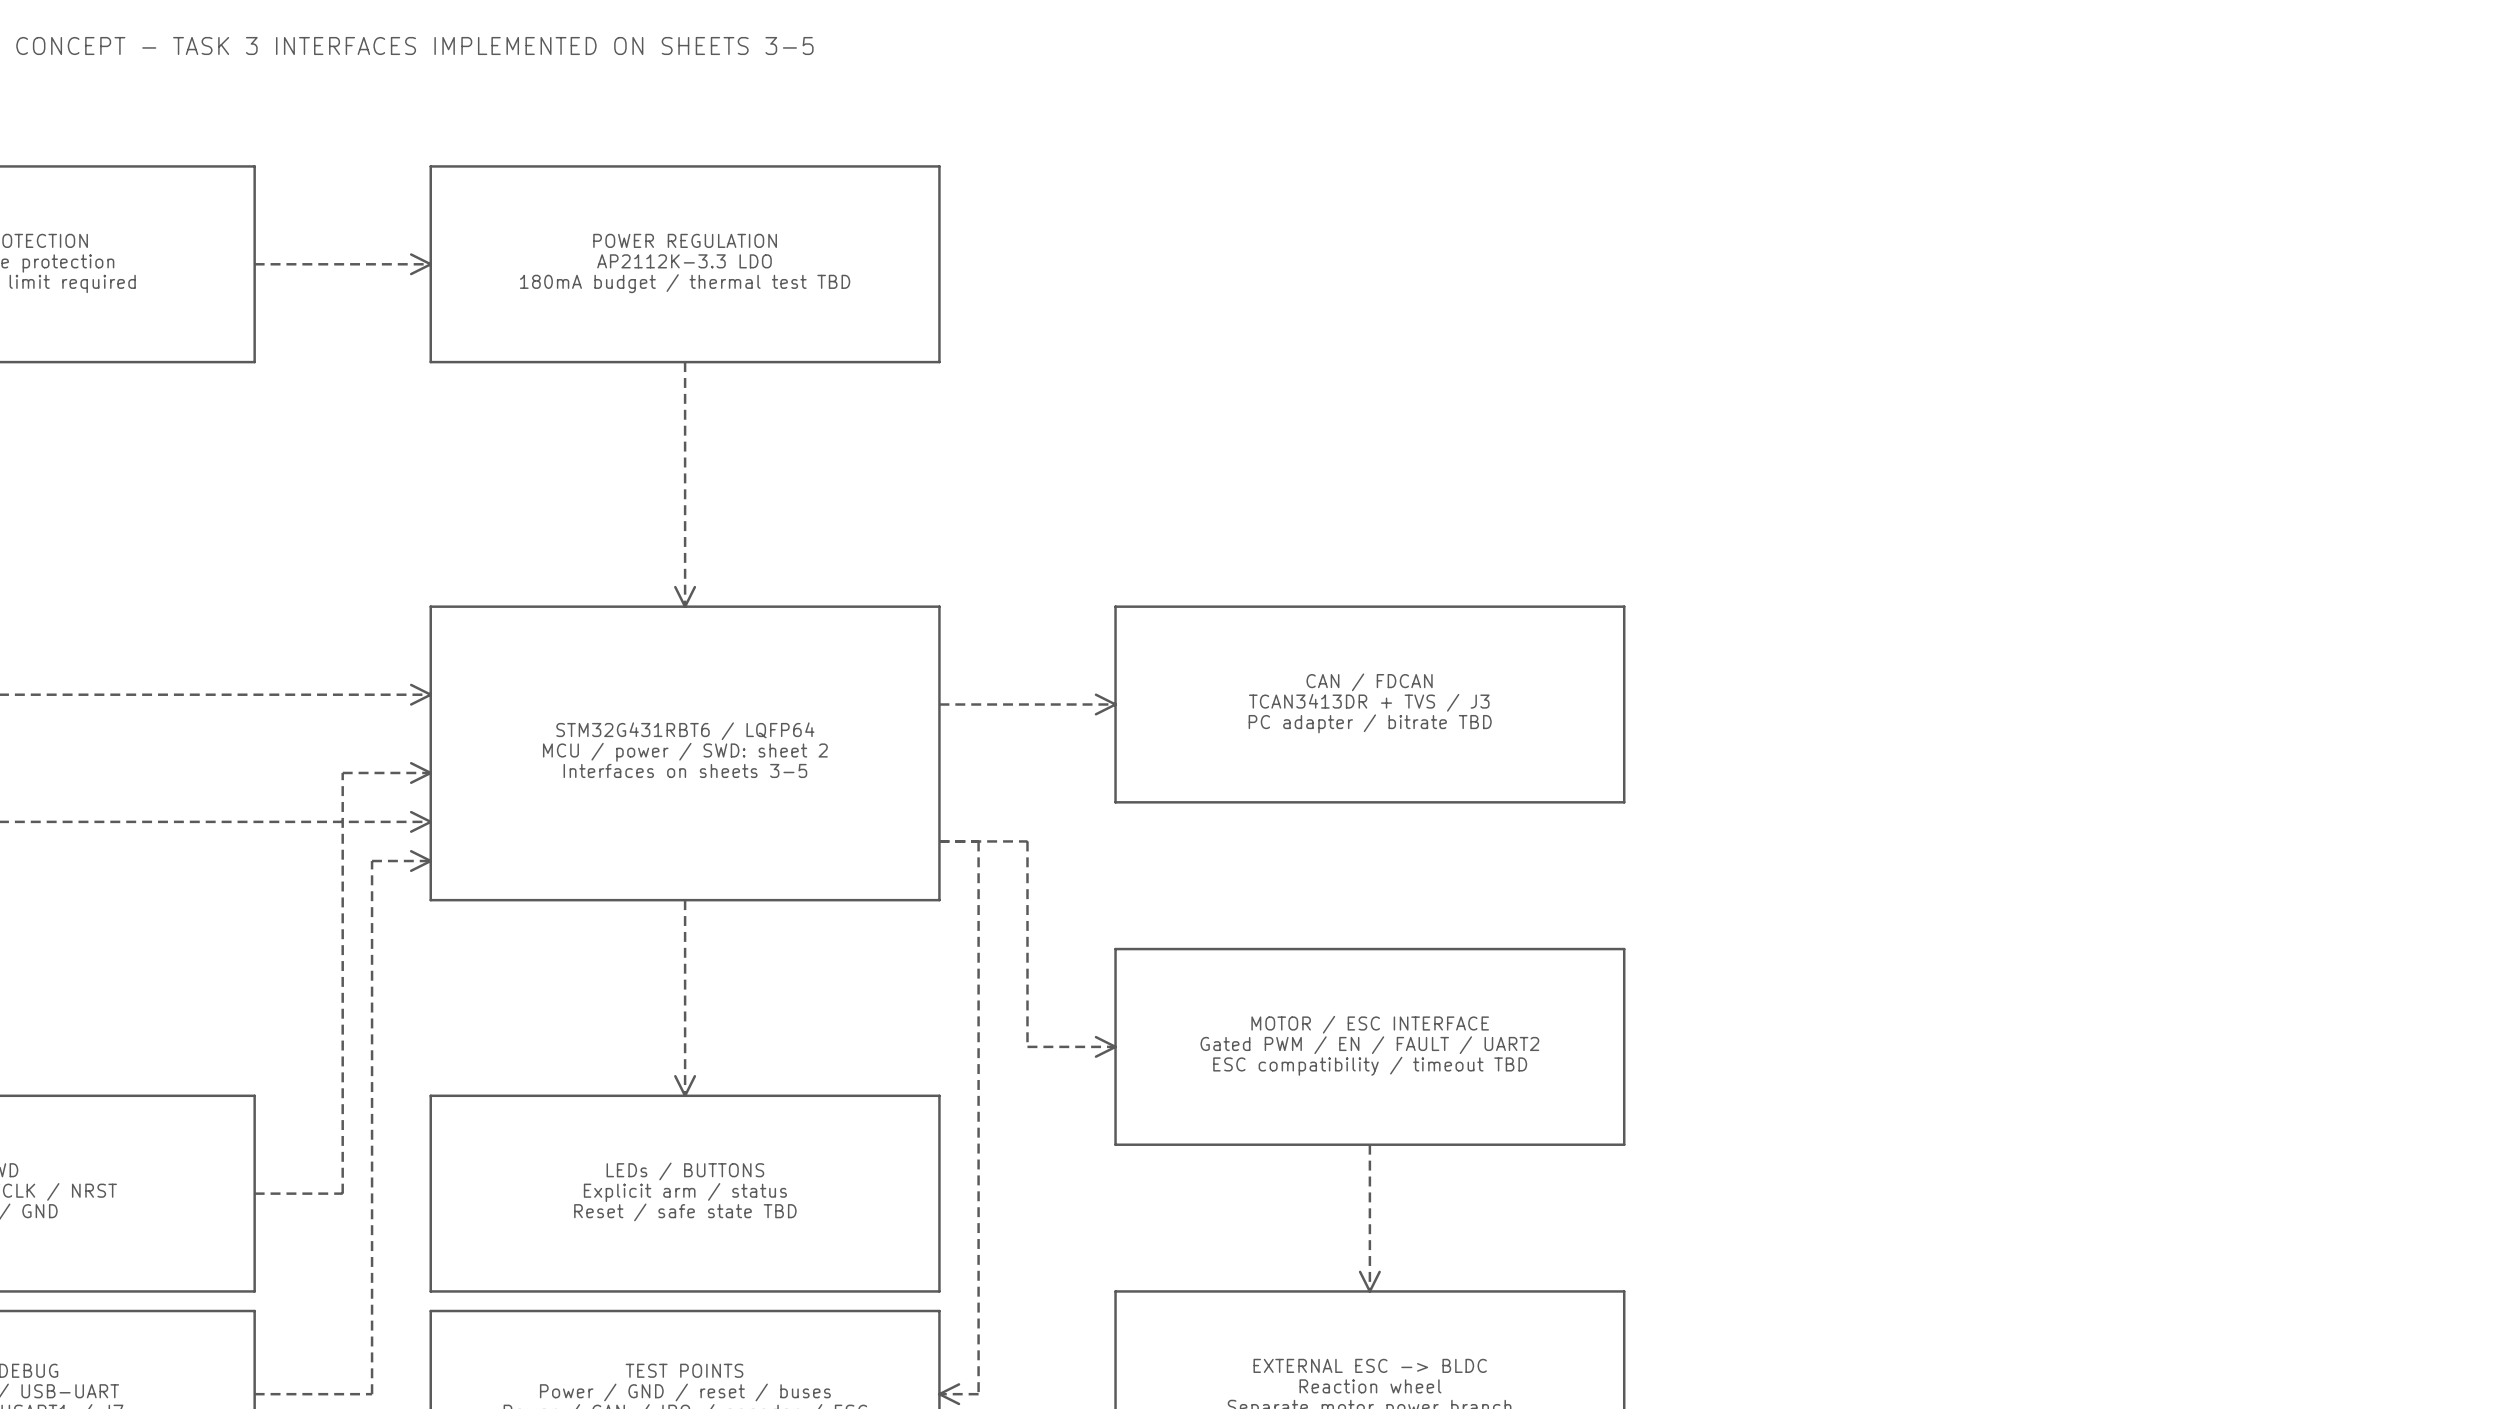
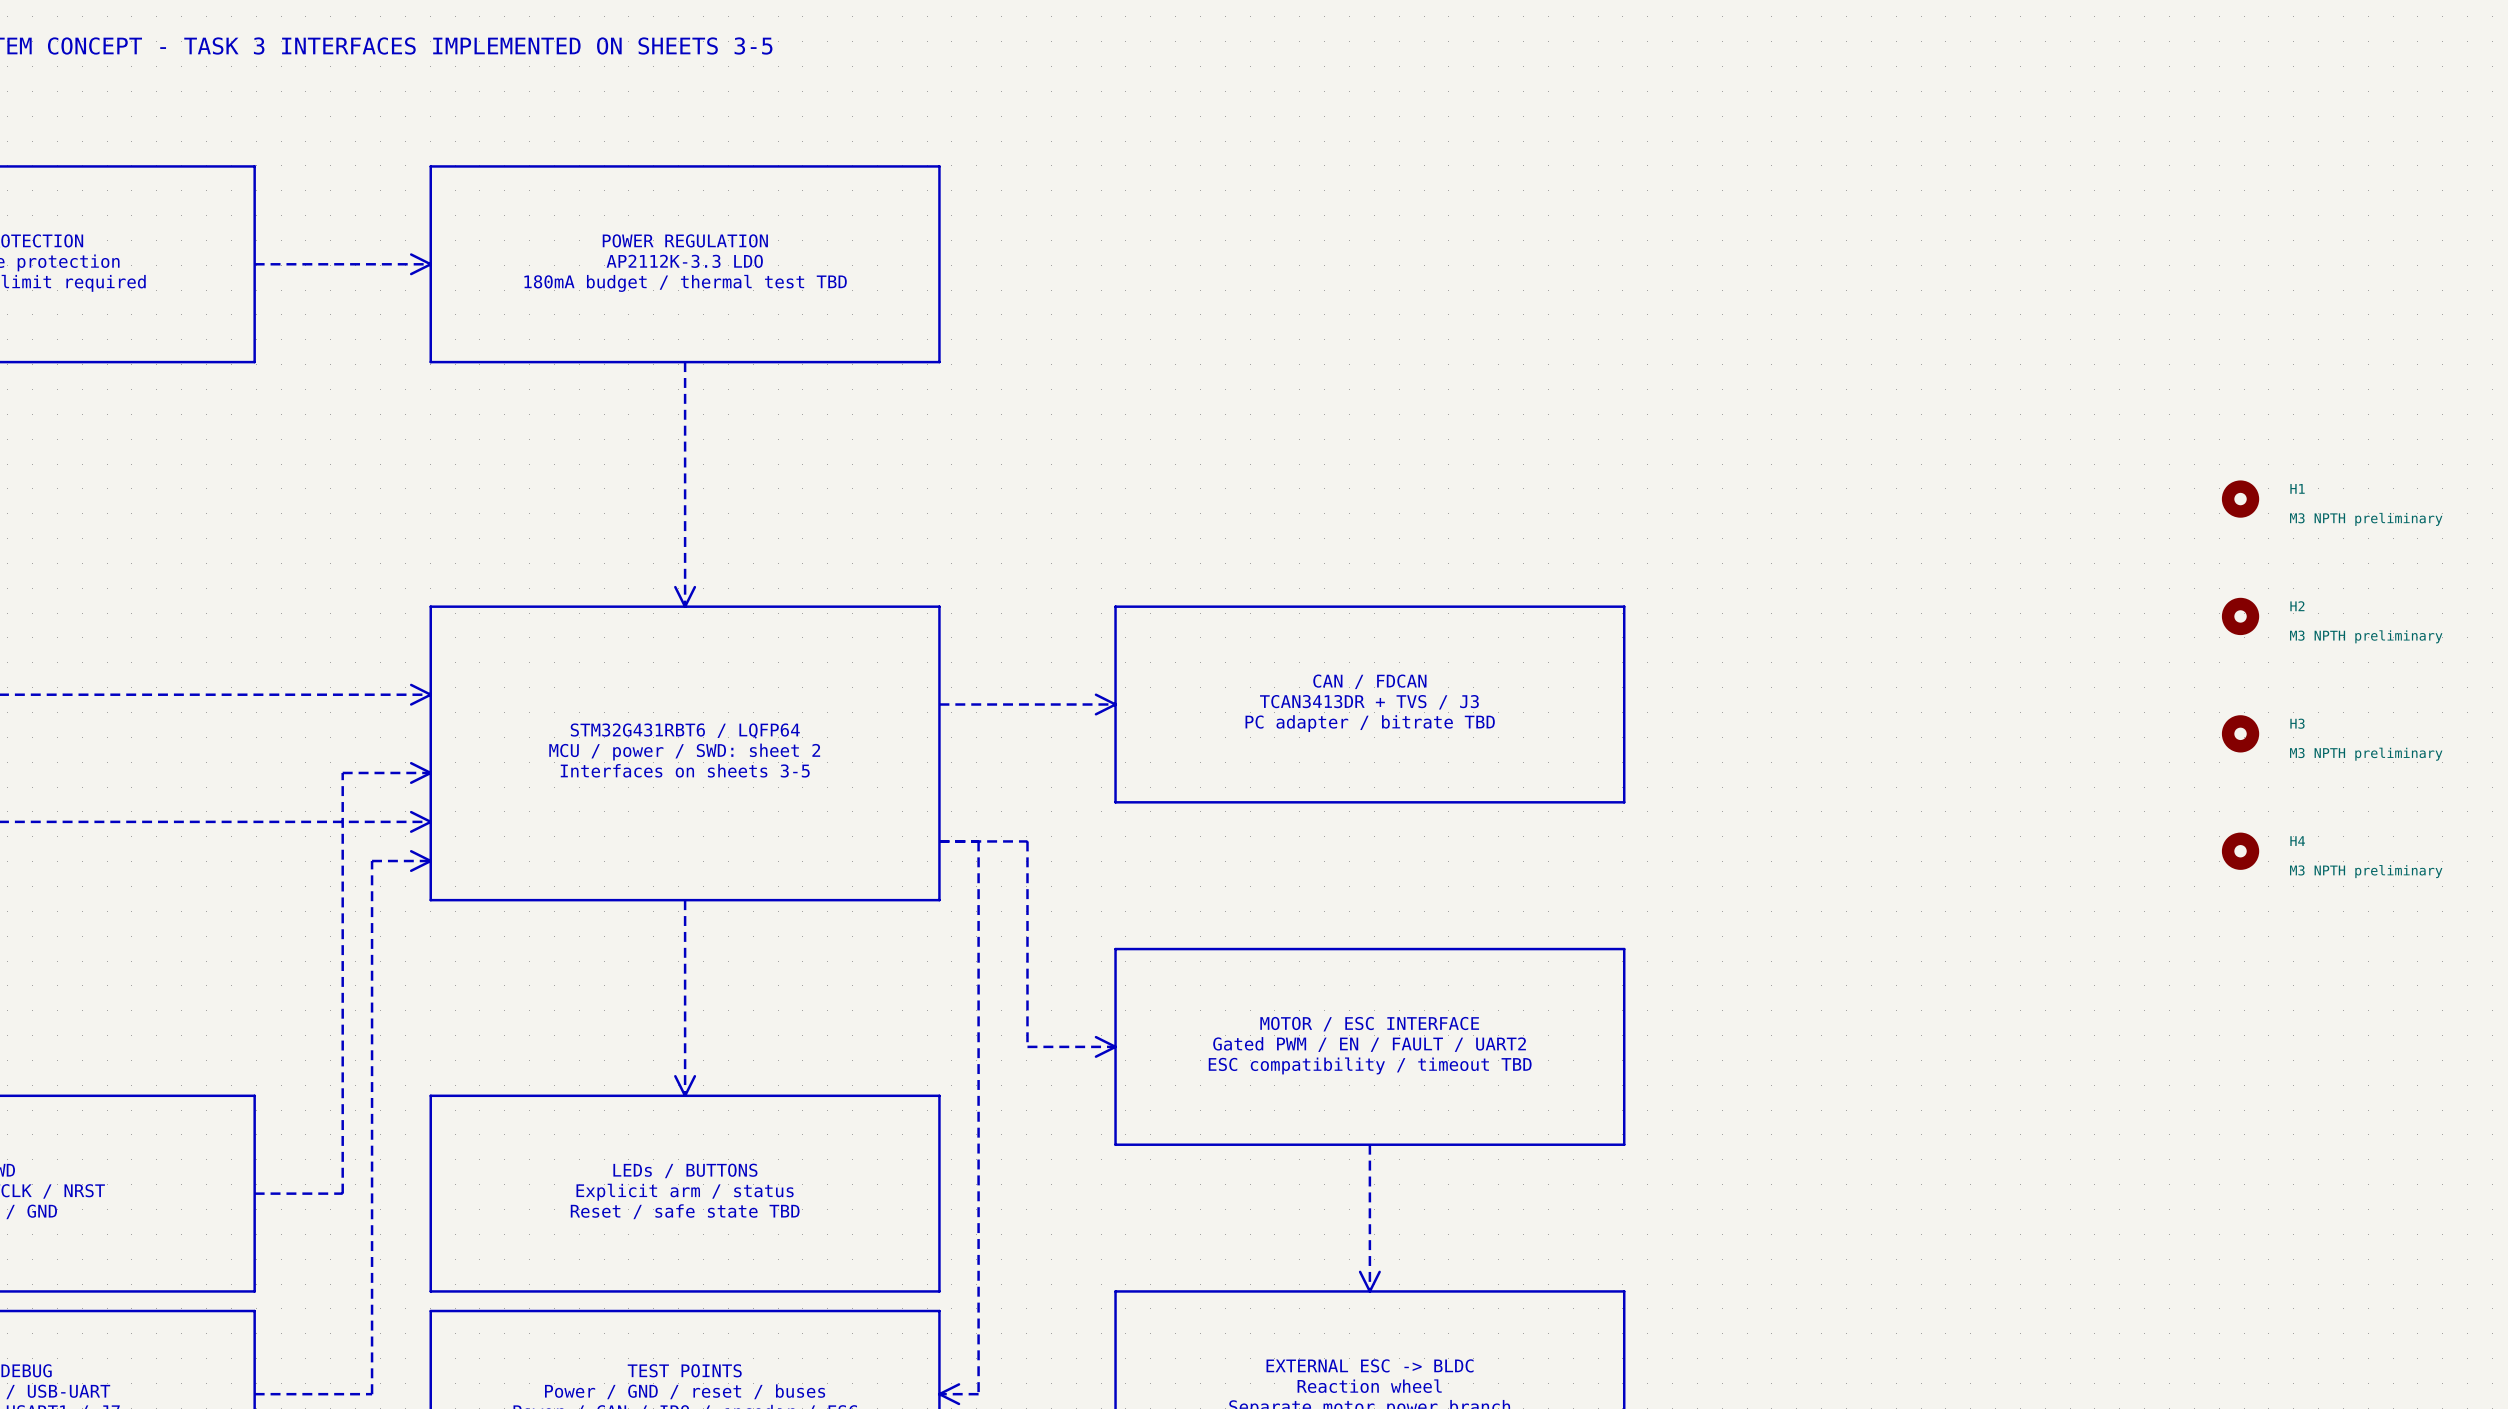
H1: none -> M3 NPTH preliminary (2240, 499)
H2: none -> M3 NPTH preliminary (2240, 616)
H3: none -> M3 NPTH preliminary (2240, 733)
H4: none -> M3 NPTH preliminary (2240, 851)

